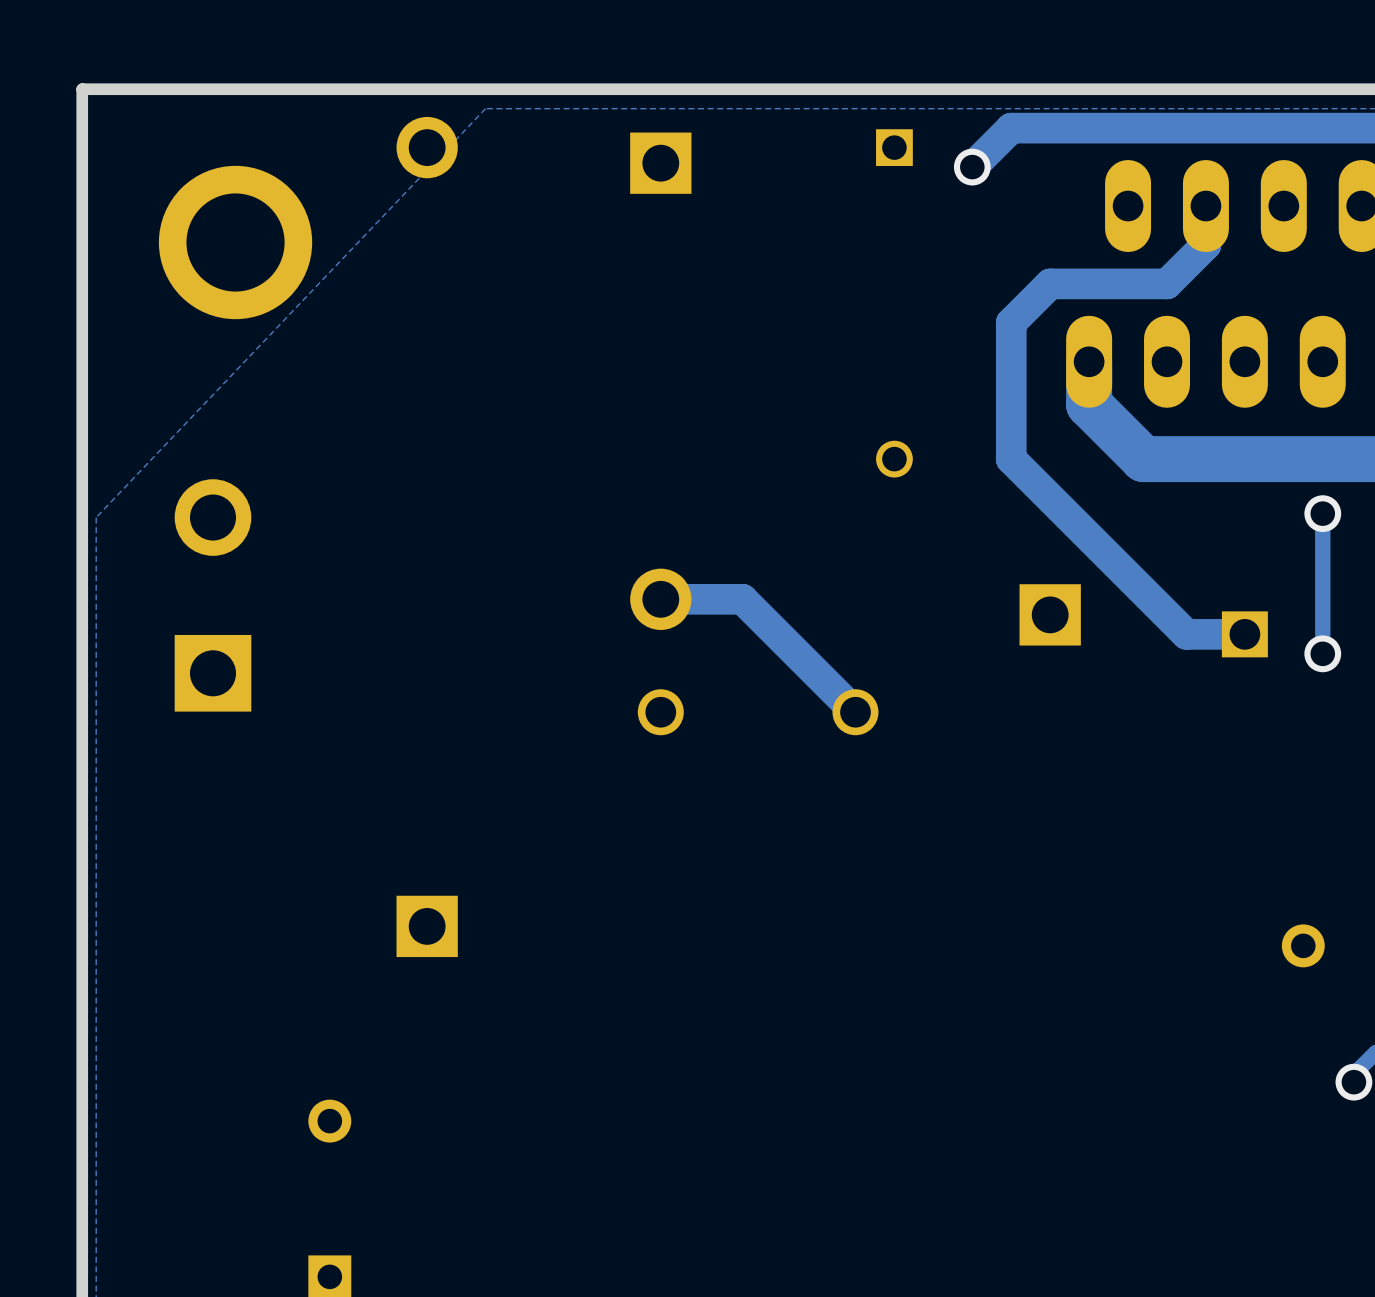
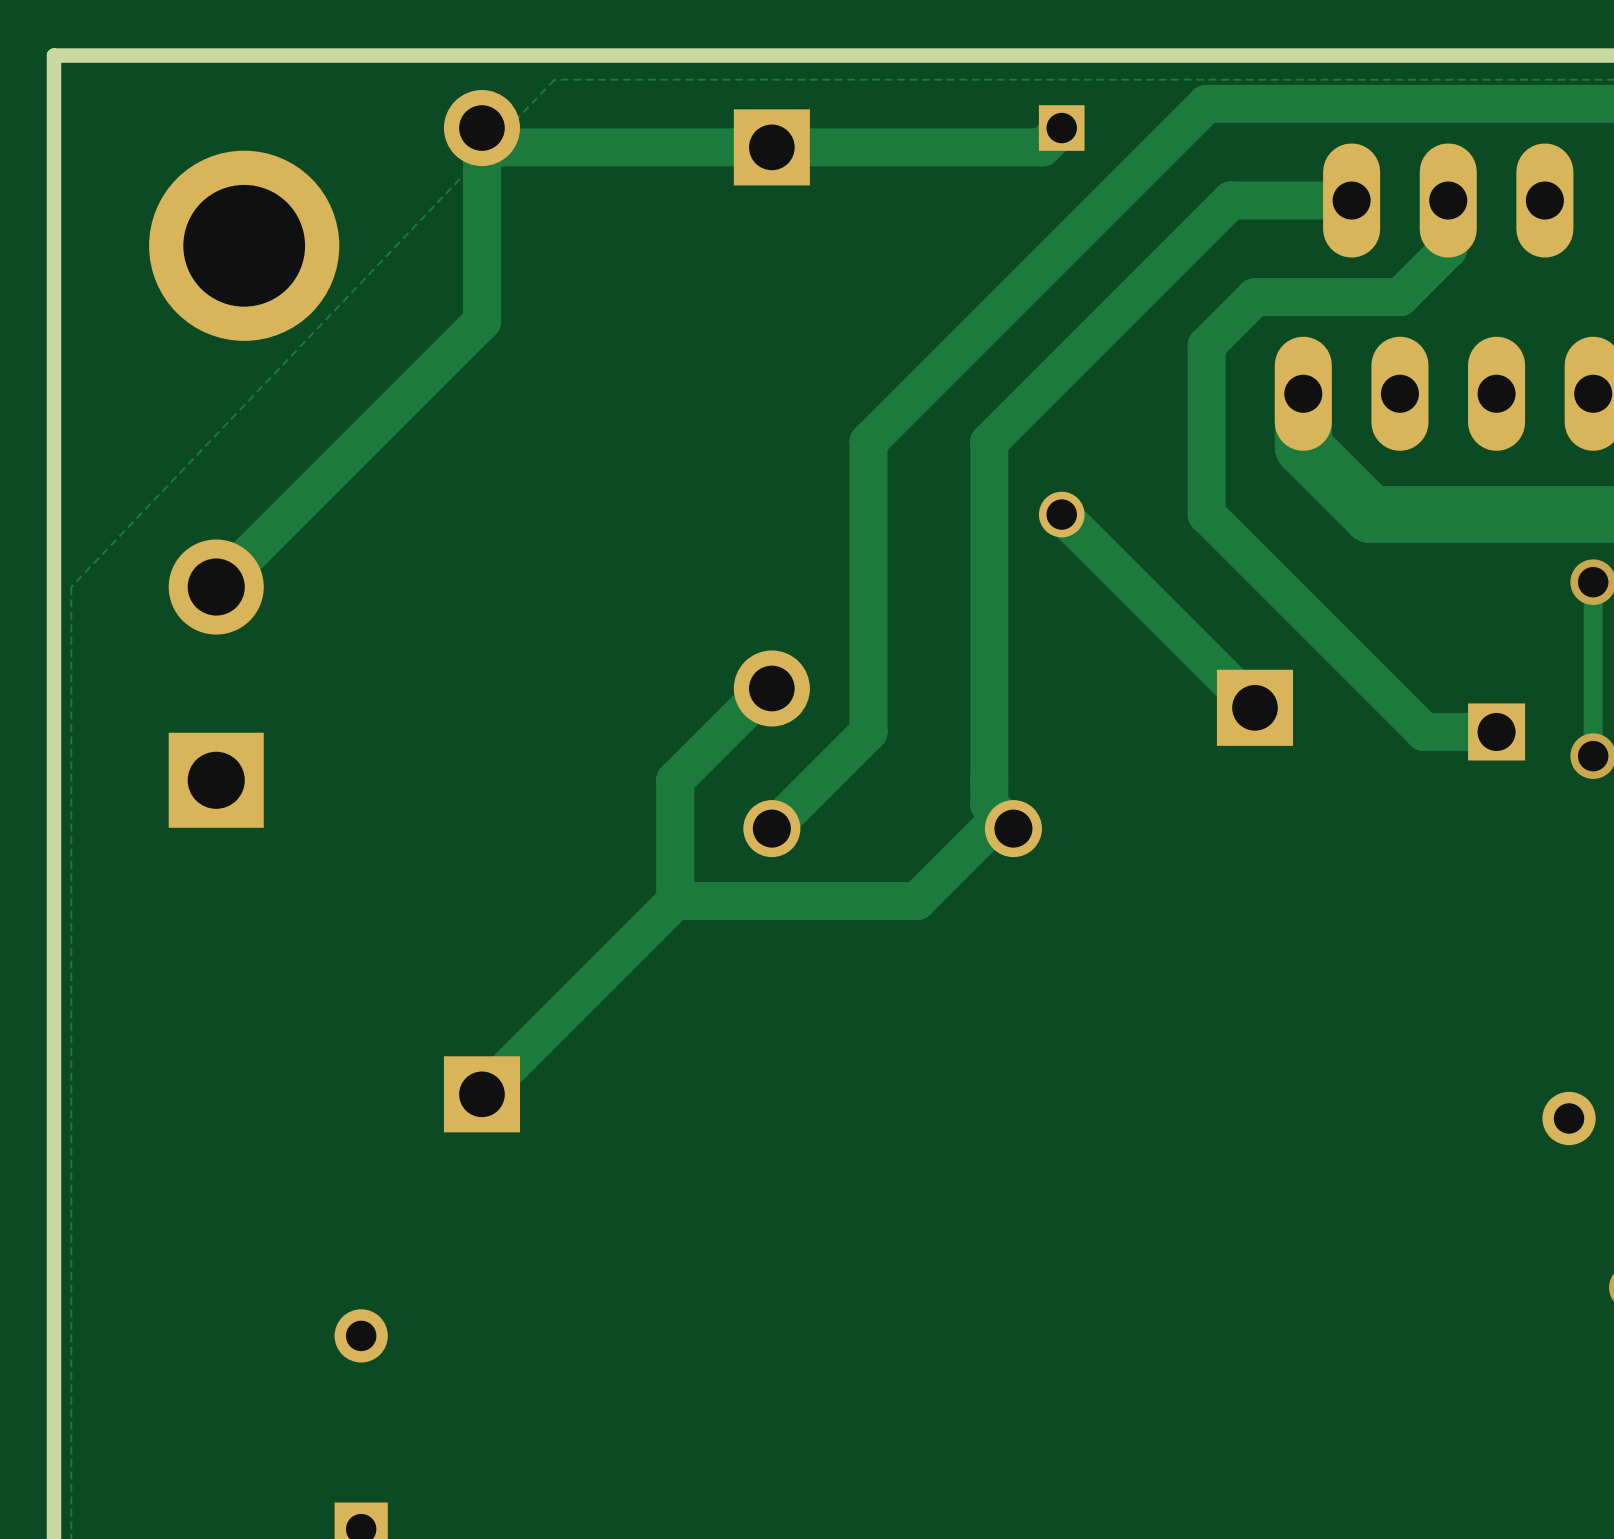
track: none -> (1061, 128) (1042, 147) (501, 147) (481, 128) (481, 321) (216, 587)
track: none -> (1158, 152) (868, 442) (868, 731) (771, 828)
via: (972, 167) -> none
track: none -> (1351, 200) (1230, 200) (989, 442) (989, 804)
track: none -> (1061, 514) (1254, 707)
track: (660, 599) (742, 599) (836, 692) -> (771, 688) (767, 688) (675, 780) (675, 901)
track: none -> (1013, 828) (989, 828) (916, 901) (675, 901)
track: none -> (675, 901) (481, 1094)

